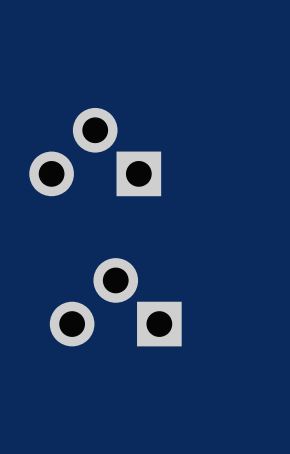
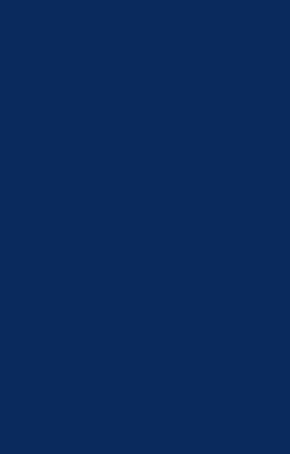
part: (95, 152) -> none
part: (115, 302) -> none

